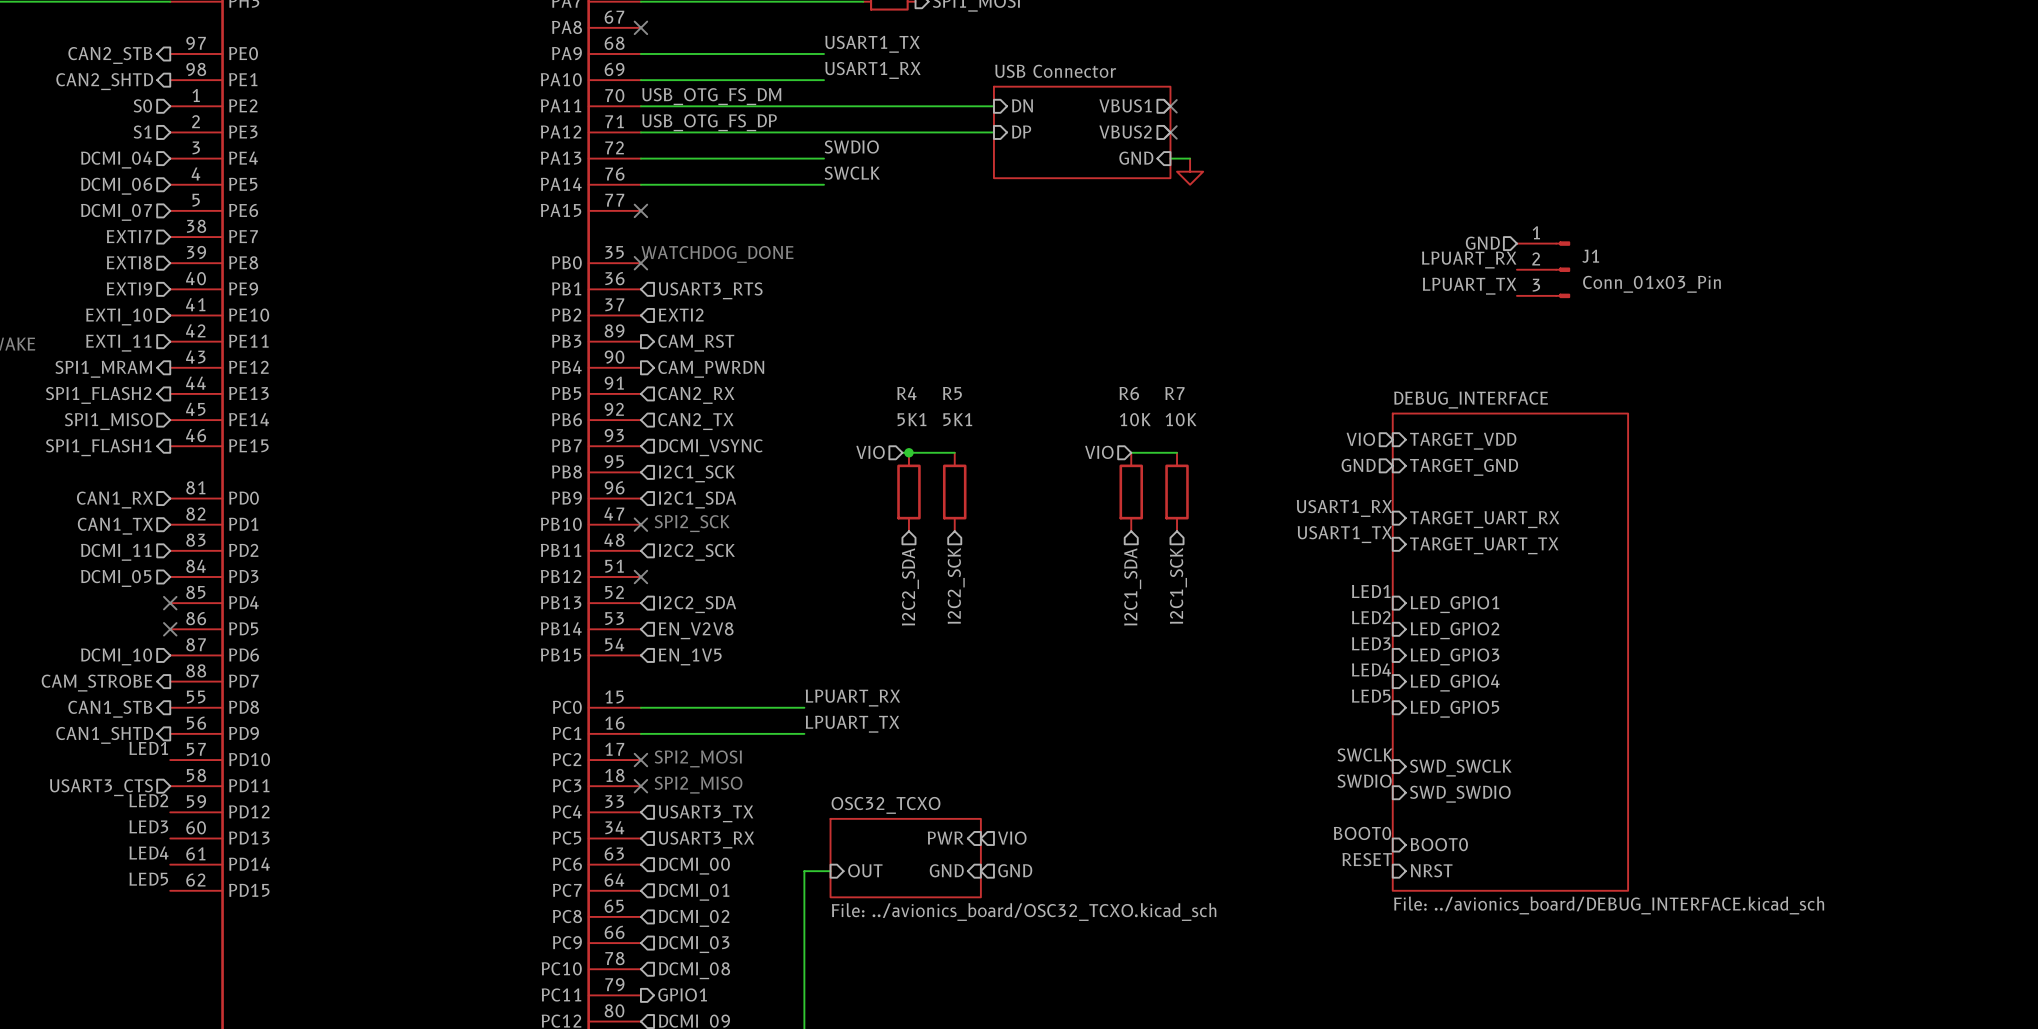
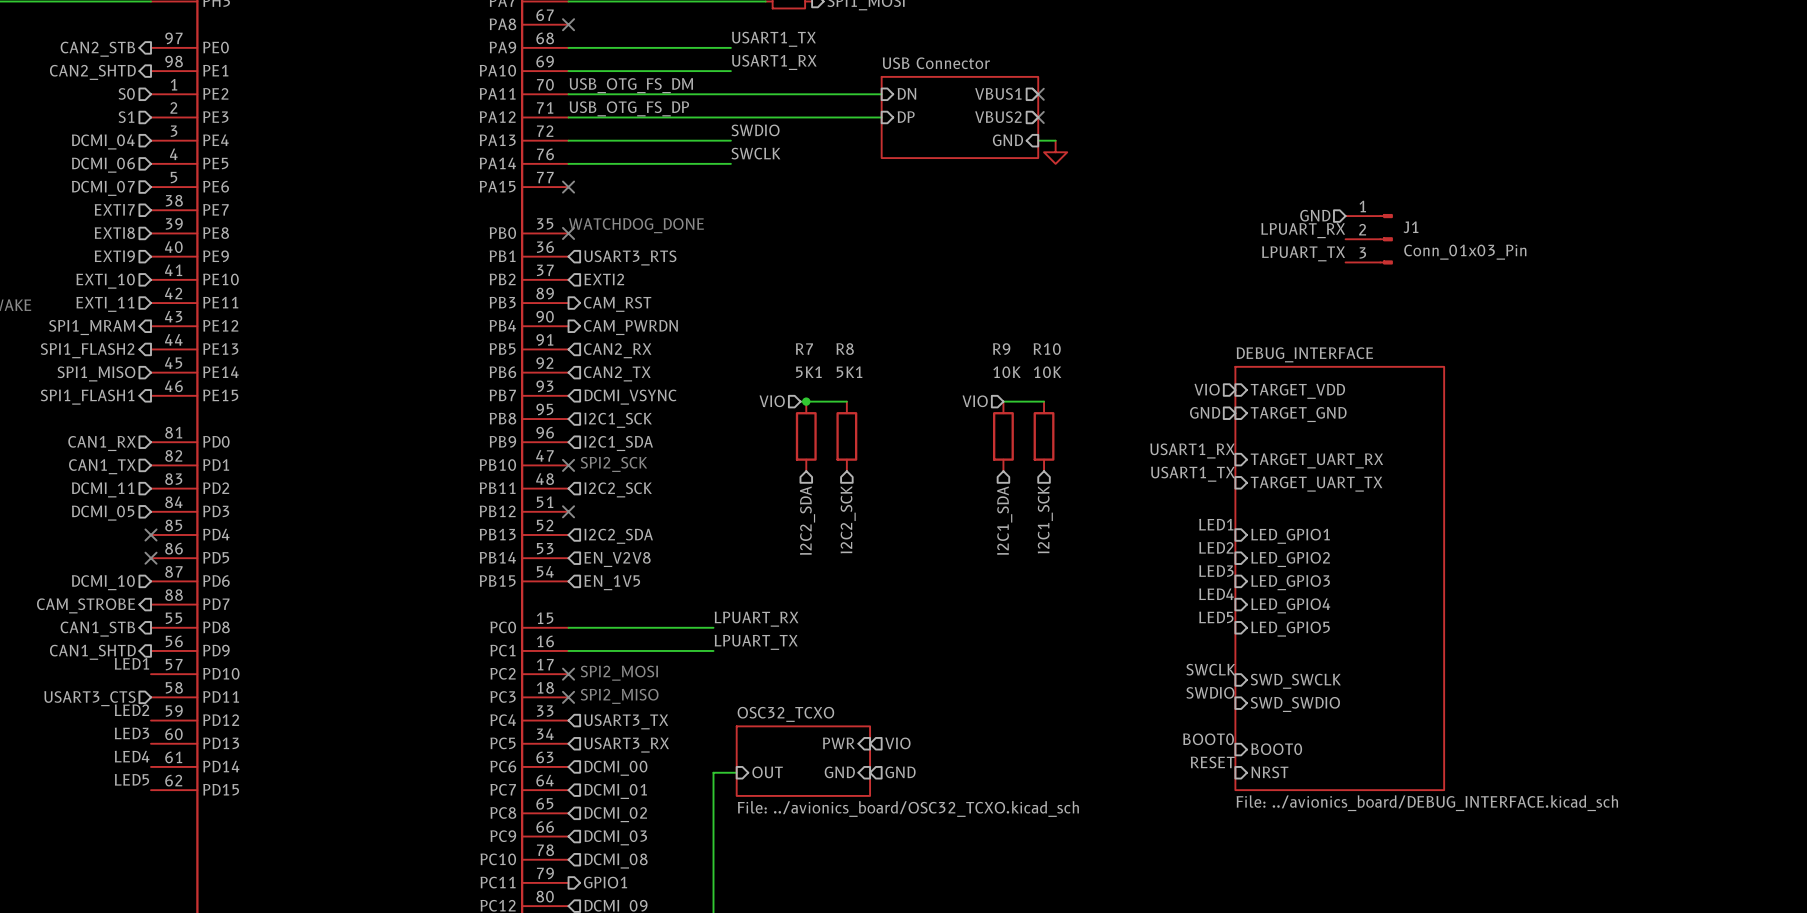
R4 name: R4 (906, 393) -> R7 (804, 349)
R5 name: R5 (952, 393) -> R8 (845, 349)
R6 name: R6 (1129, 393) -> R9 (1001, 349)
R7 name: R7 (1174, 393) -> R10 (1047, 349)

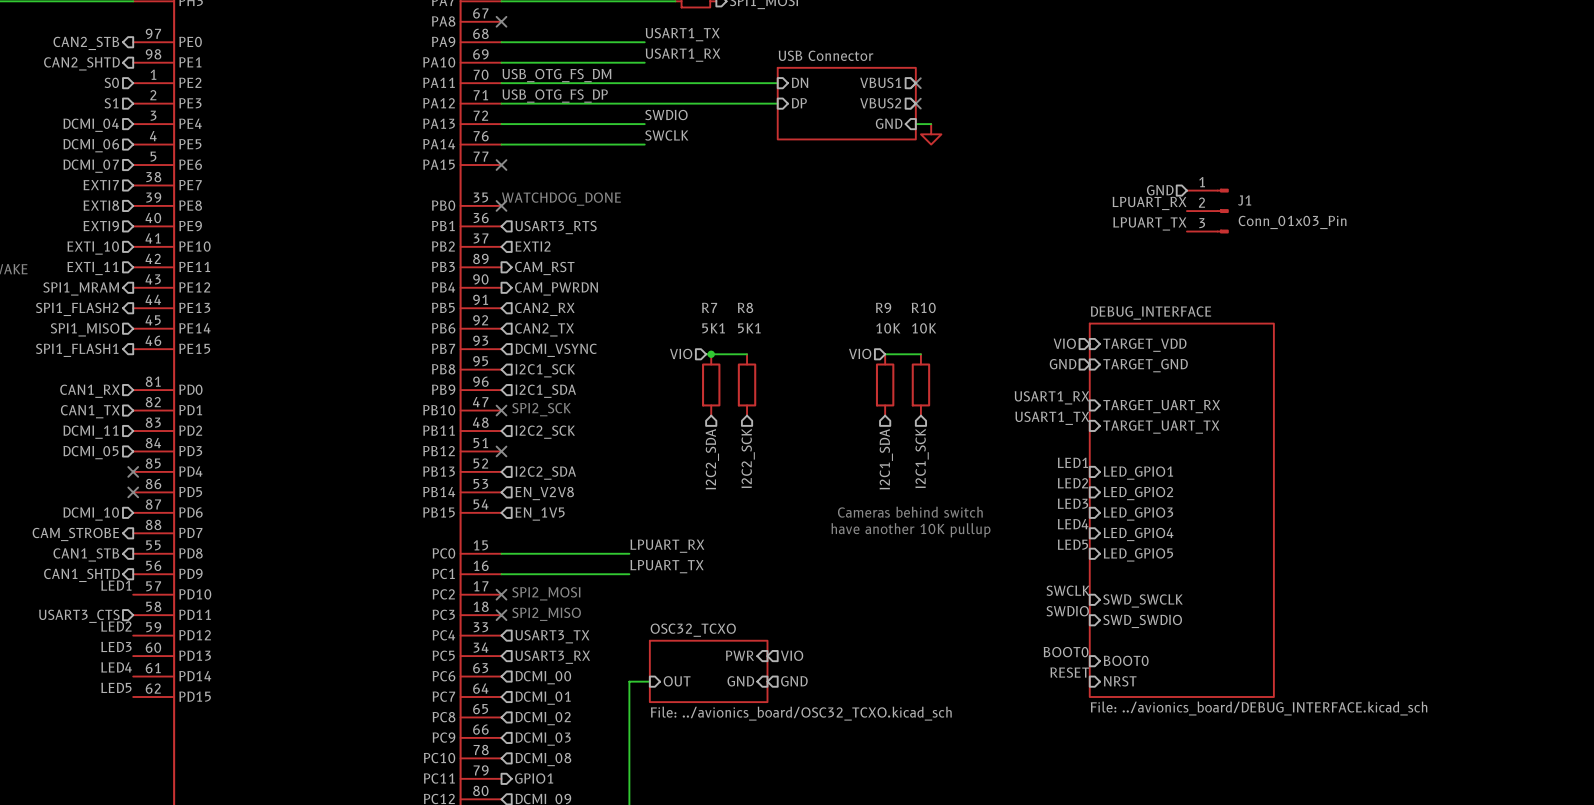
text: none -> Cameras behind switch (910, 512)
text: none -> have another 10K pullup (910, 530)

